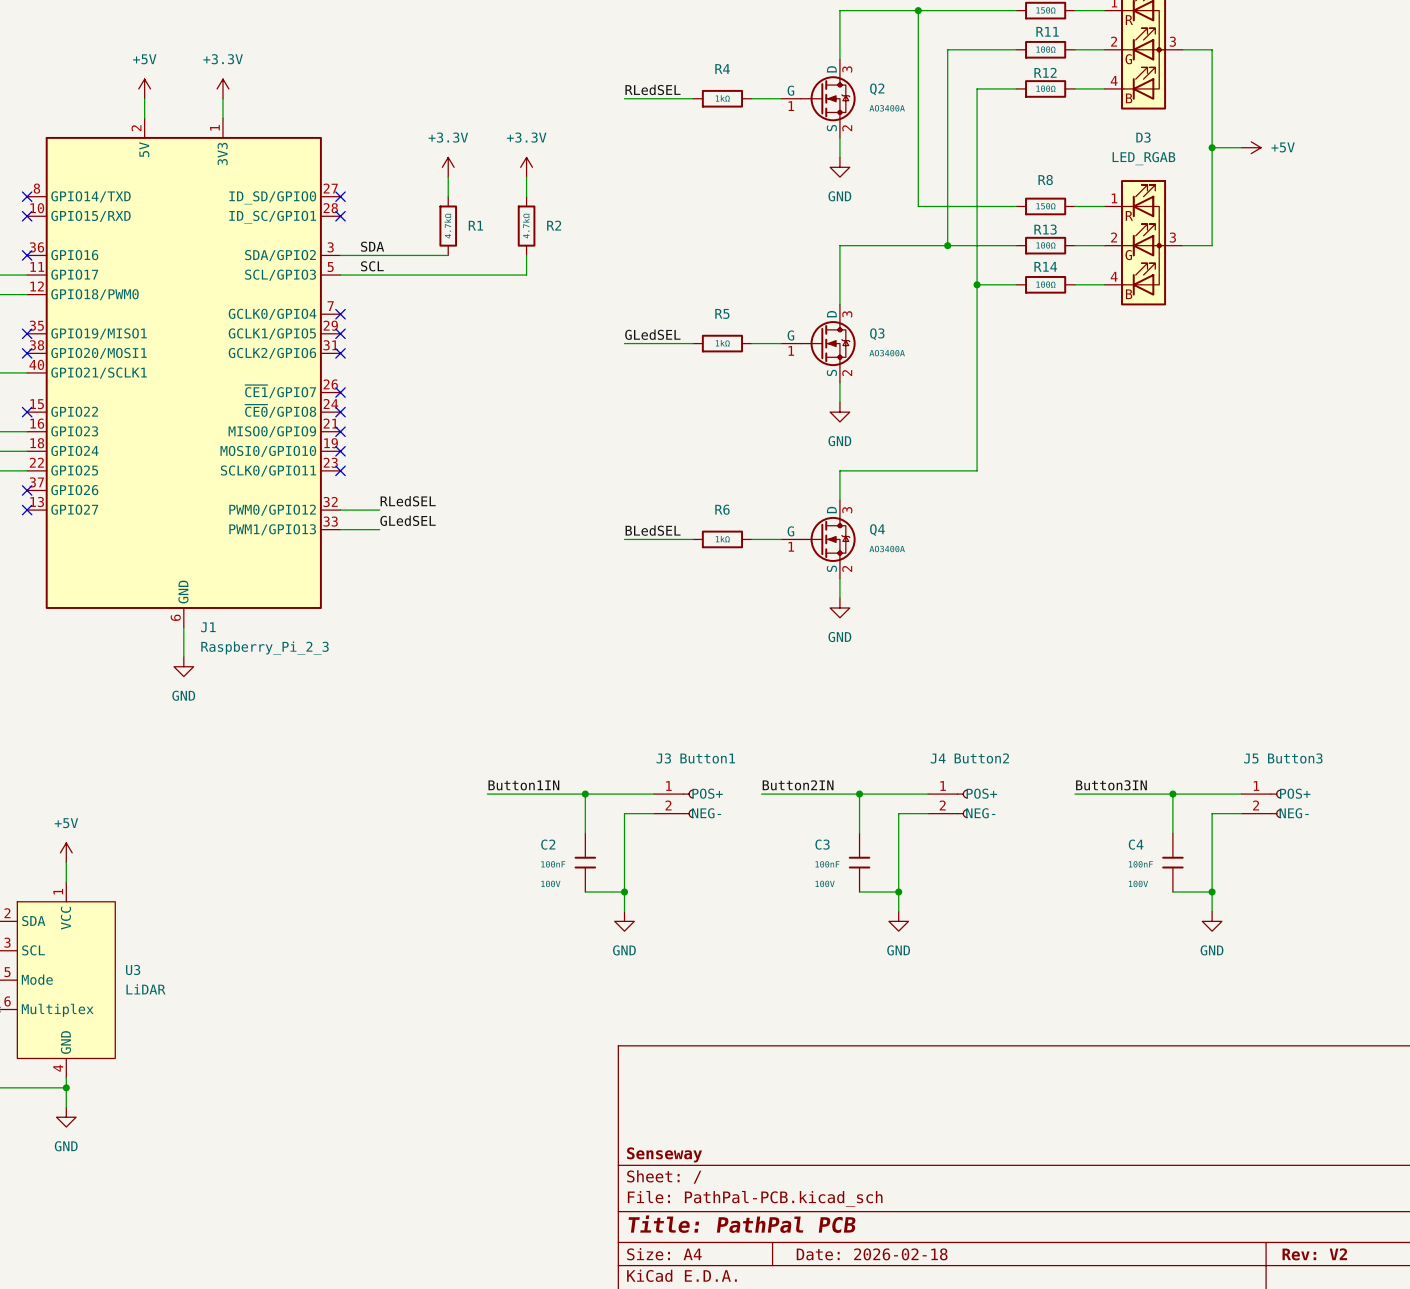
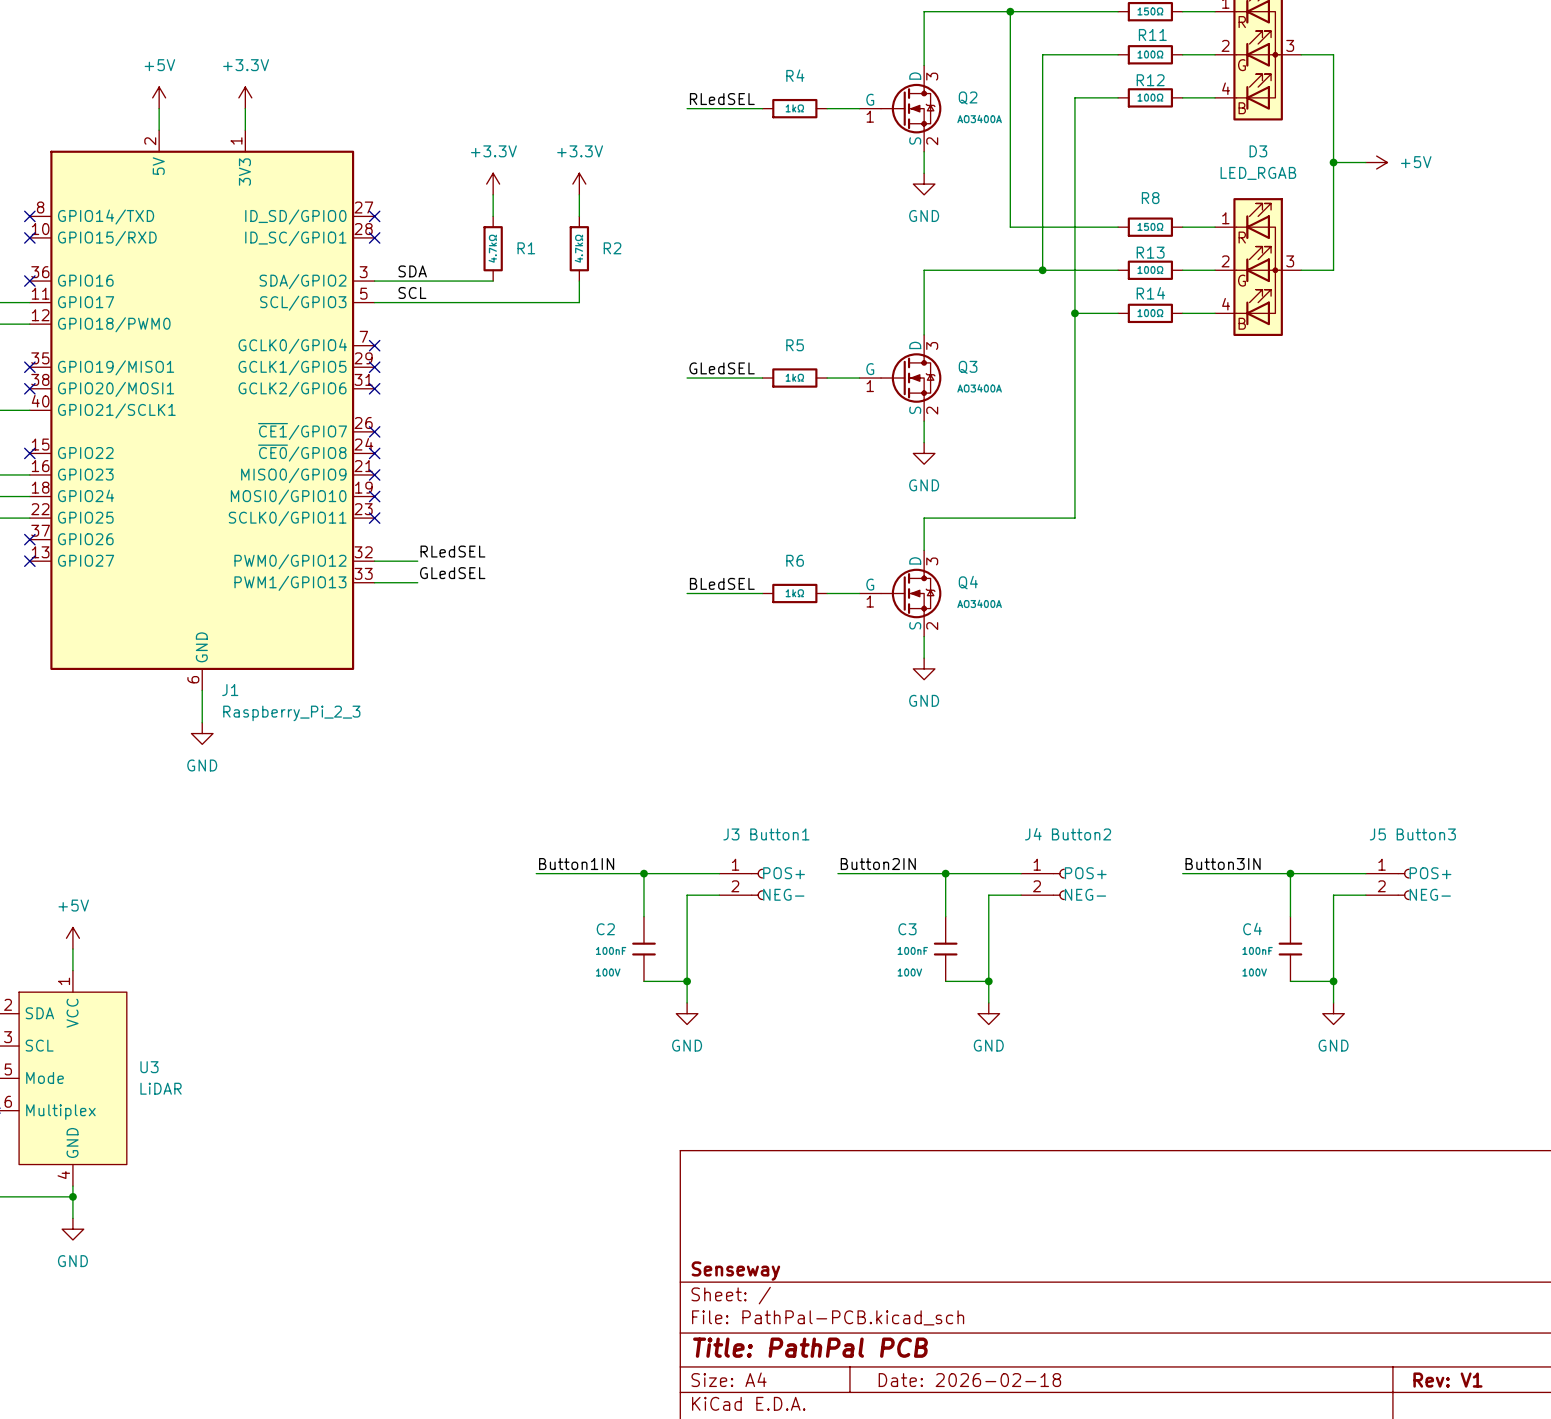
title block: Rev: V2 (1314, 1254) -> Rev: V1 (1447, 1380)

